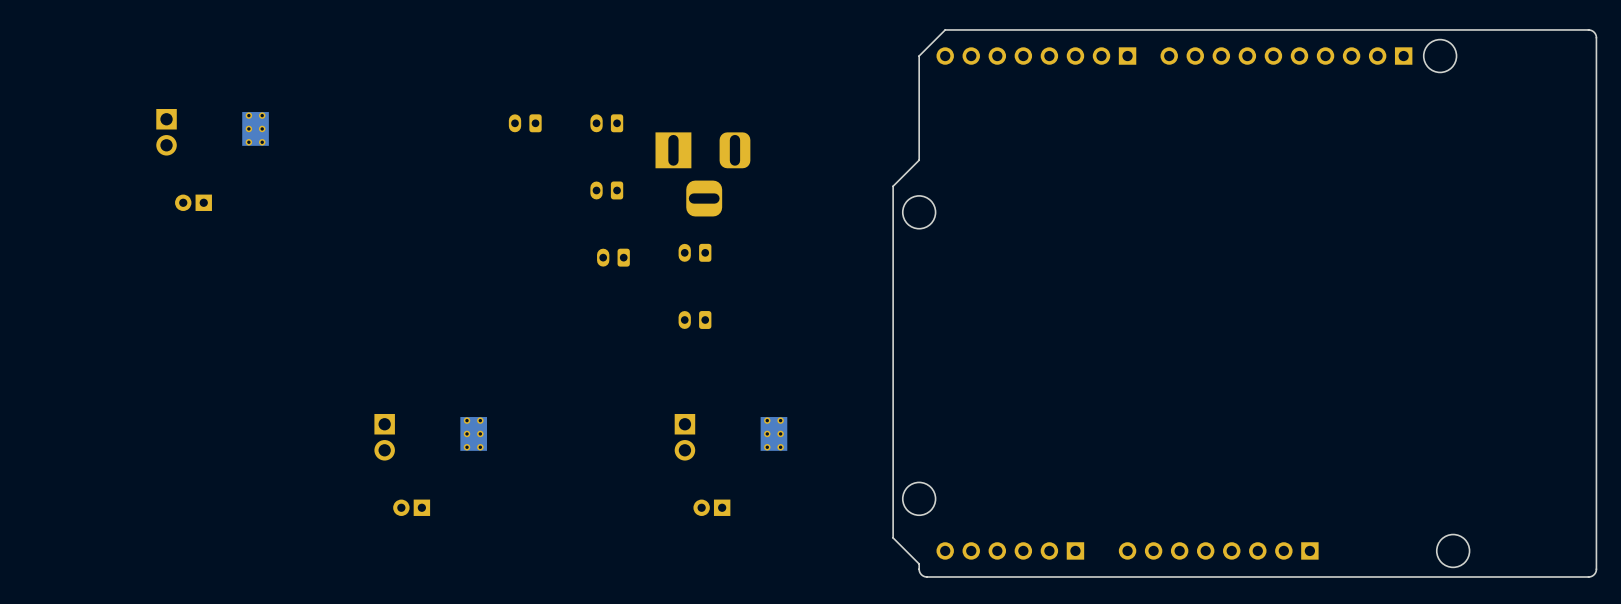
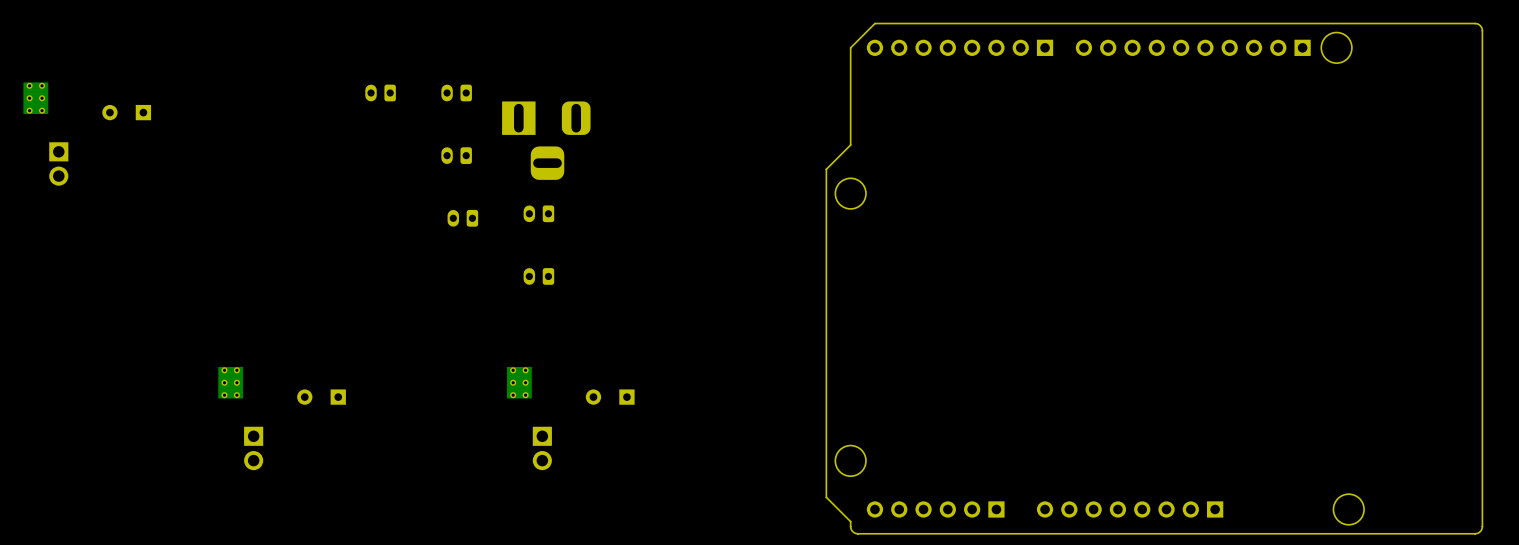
part: none -> (380, 92)
part: none -> (456, 92)
part: none -> (35, 98)
part: (525, 123) -> none
part: (606, 123) -> none
part: none -> (126, 112)
part: (255, 128) -> none
part position: (166, 132) -> (58, 163)
part: none -> (456, 155)
part position: (702, 174) -> (546, 140)
part: (606, 190) -> none
part: (193, 202) -> none
part: none -> (538, 213)
part: none -> (462, 218)
part: (694, 252) -> none
part: (613, 257) -> none
part: none -> (538, 276)
part: (694, 319) -> none
part: none -> (230, 382)
part: none -> (321, 397)
part: none -> (610, 397)
part position: (473, 433) -> (519, 382)
part: (773, 433) -> none
part: (384, 437) -> none
part: (684, 437) -> none
part: none -> (253, 448)
part: none -> (542, 448)
part: (411, 507) -> none
part: (711, 507) -> none

